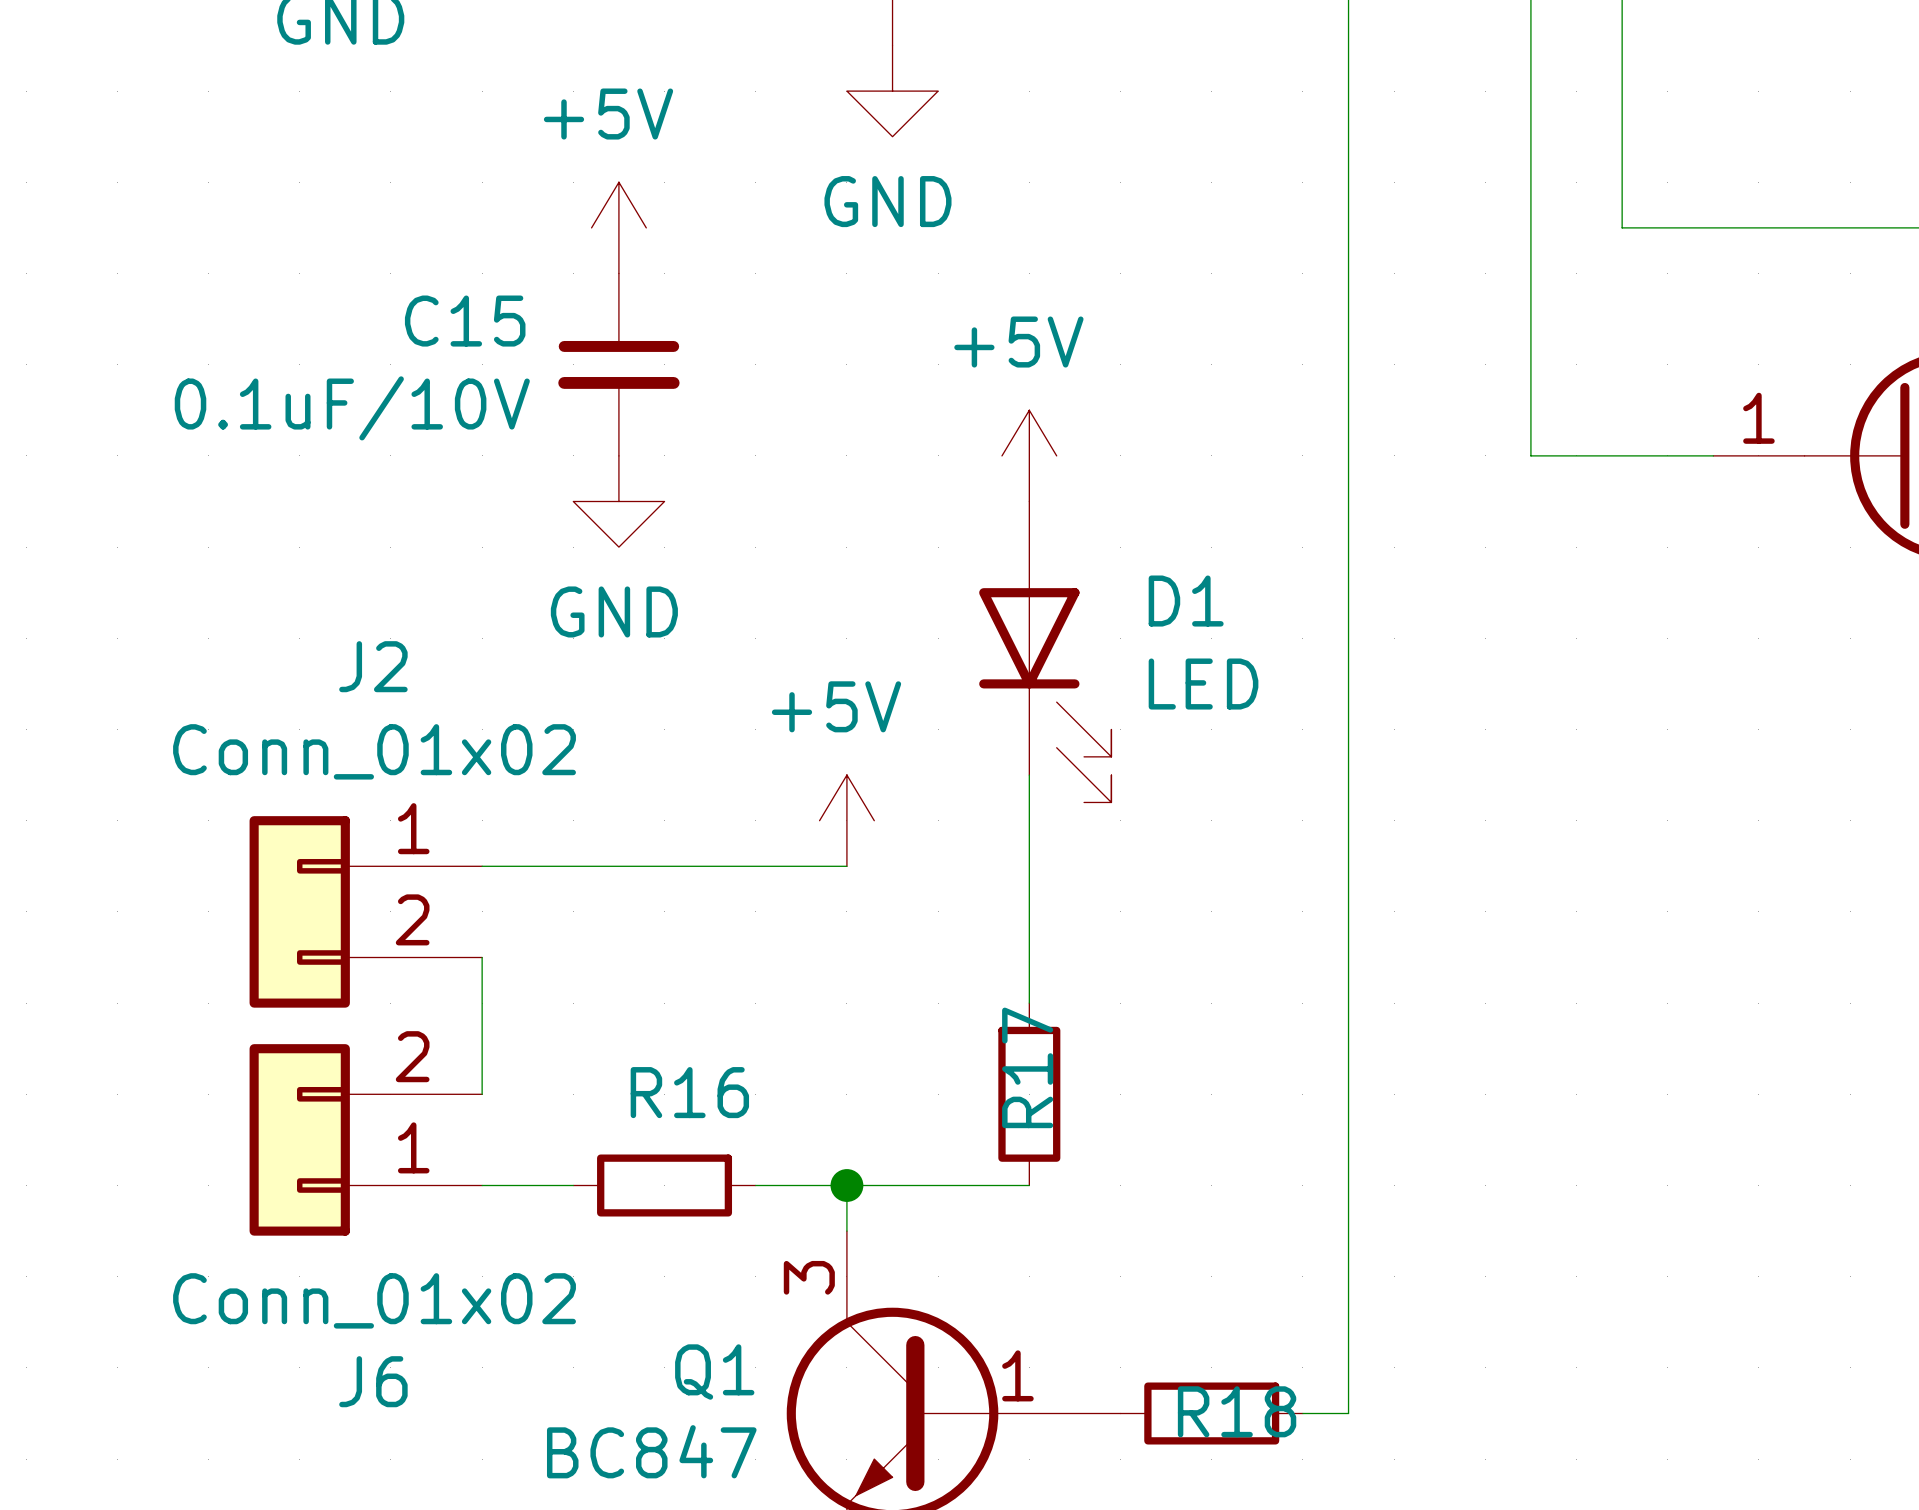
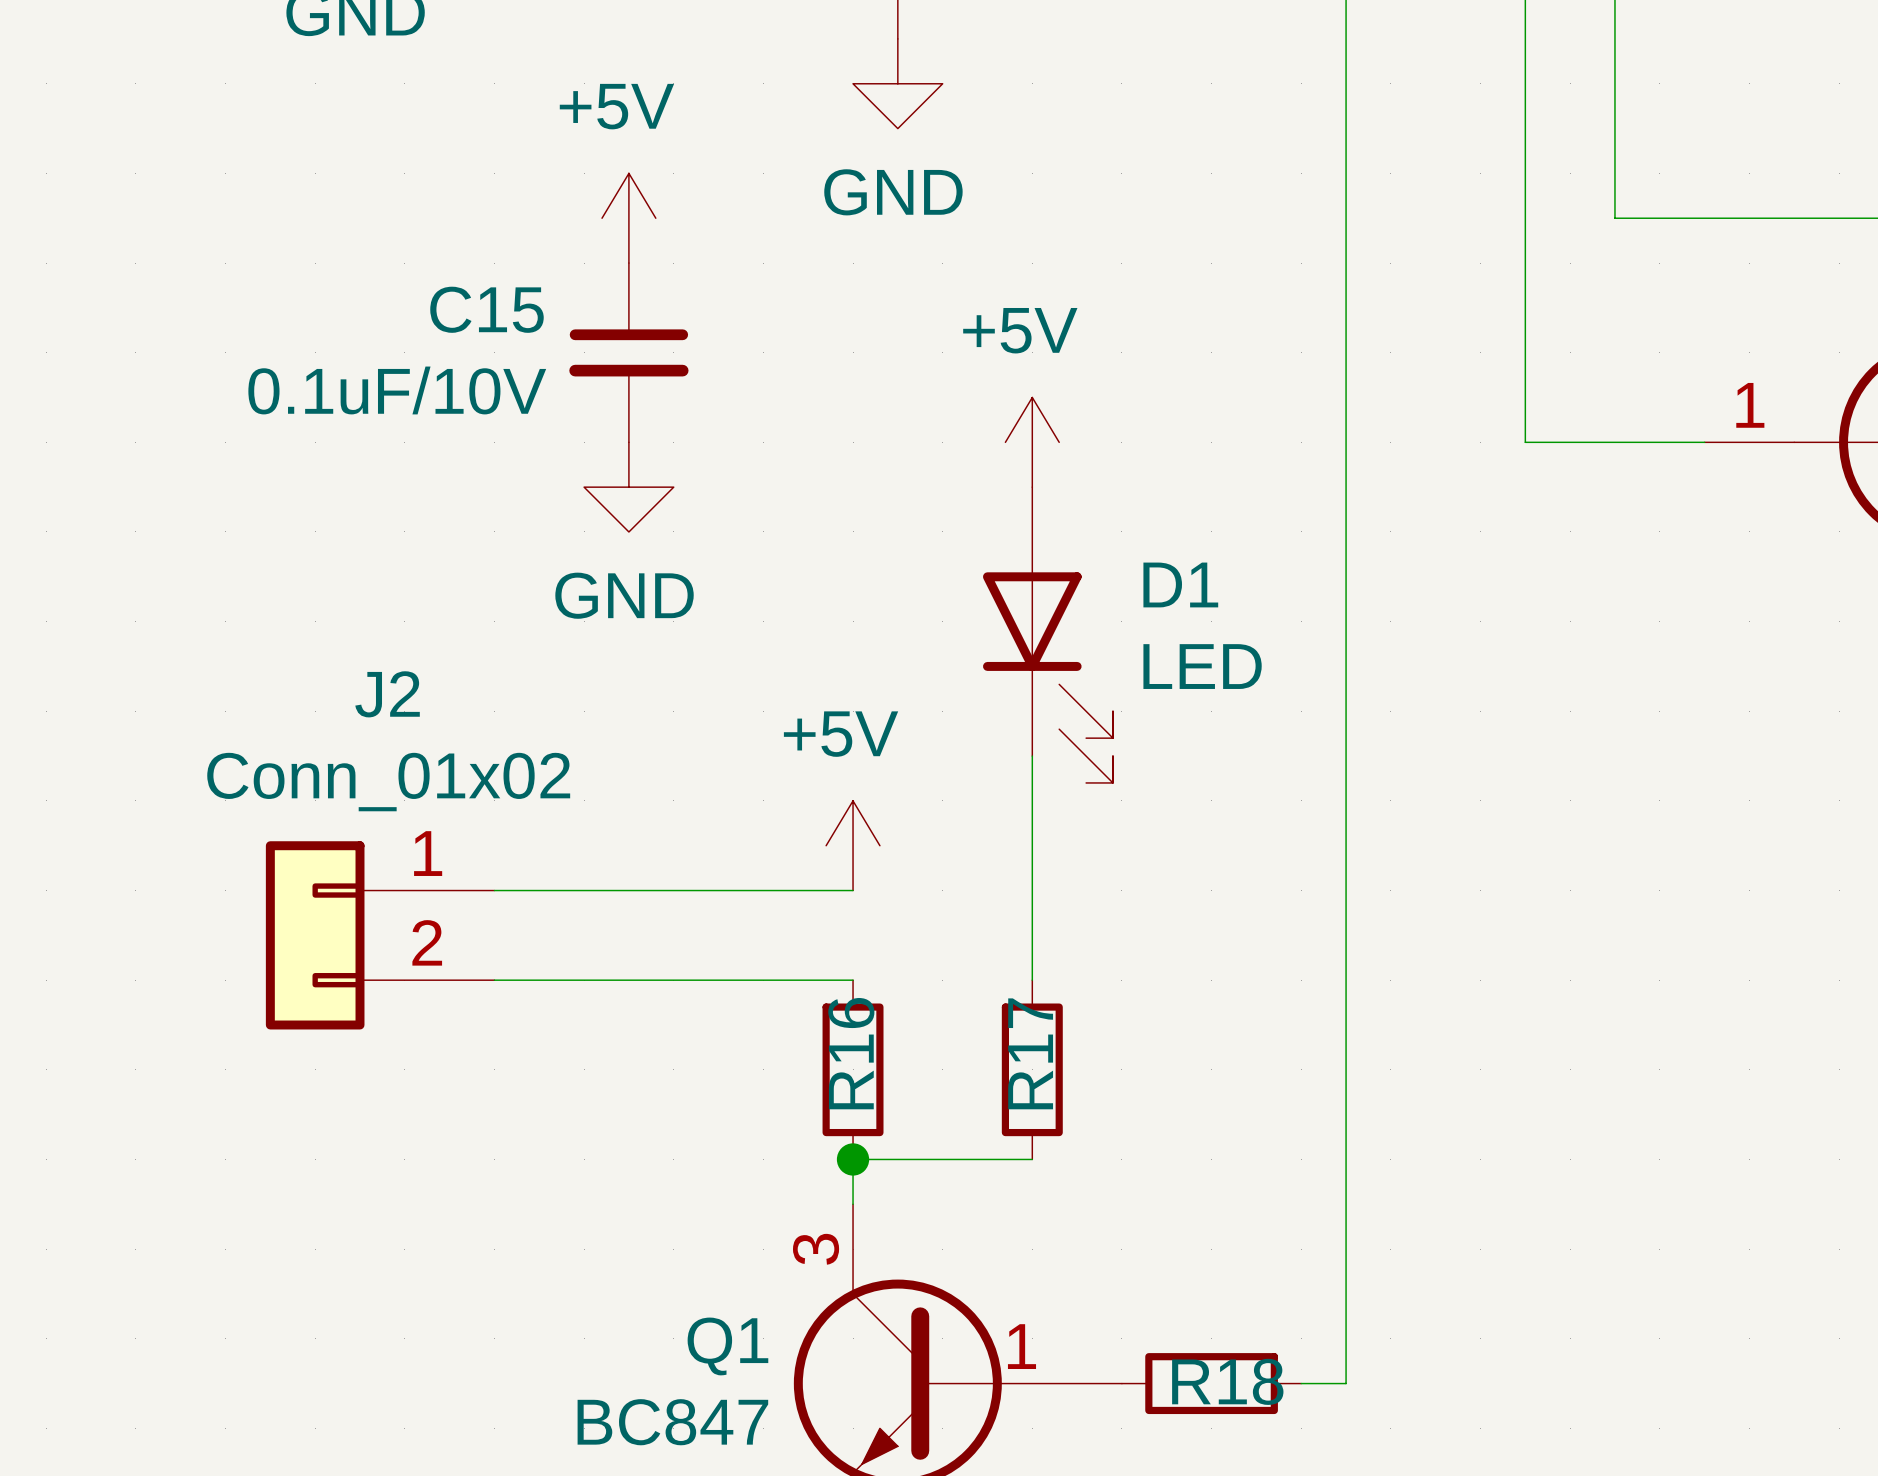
power symbol position: +5V (846, 820) -> +5V (853, 845)
wire: (482, 866) (846, 866) -> (494, 890) (853, 890)
J2 position: (365, 911) -> (380, 935)
wire: (482, 957) (482, 1094) -> none
wire: none -> (494, 980) (853, 980)
J6: Conn_01x02 (365, 1139) -> none
wire: (482, 1185) (573, 1185) -> none
R16 rotation: 0° (664, 1185) -> 90° clockwise (853, 1069)
R16 position: (664, 1185) -> (853, 1069)
wire: (755, 1185) (846, 1185) -> none

